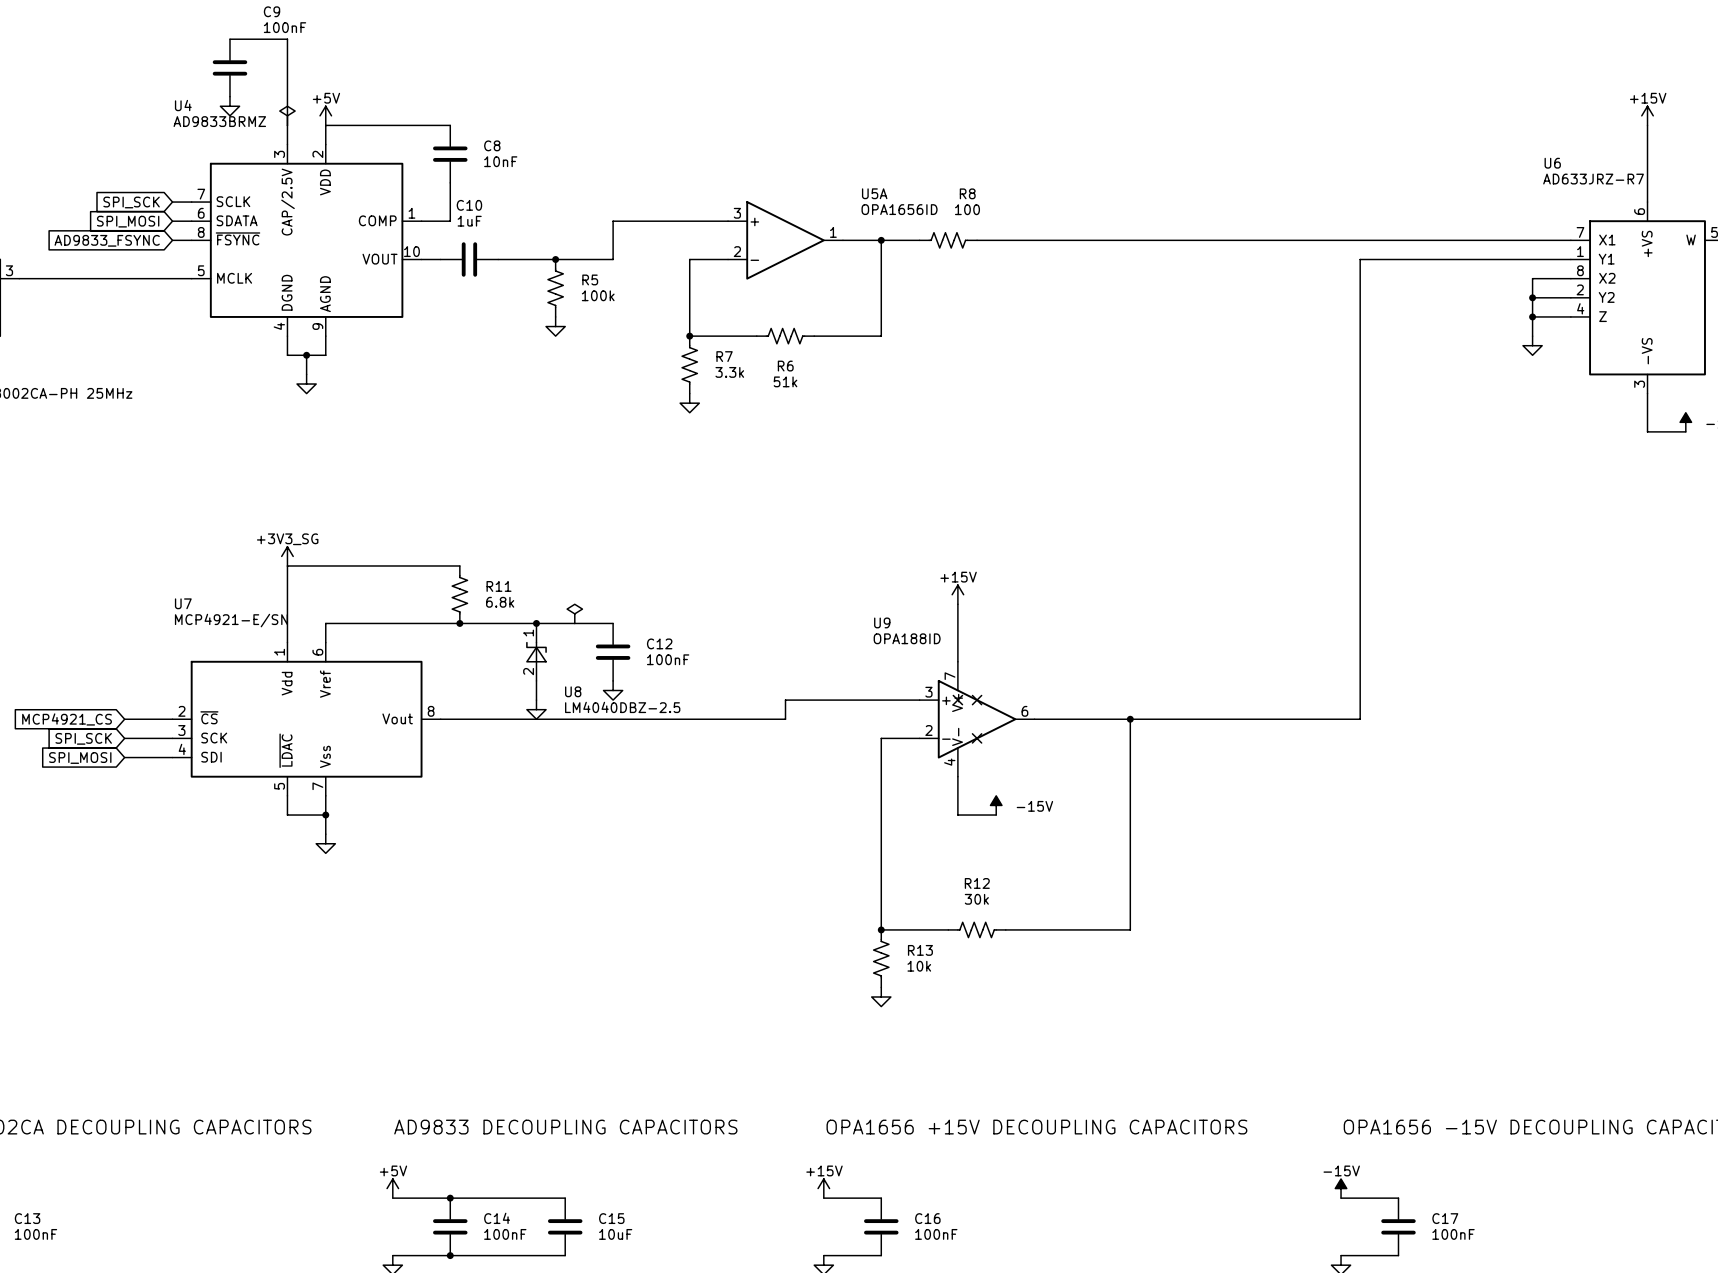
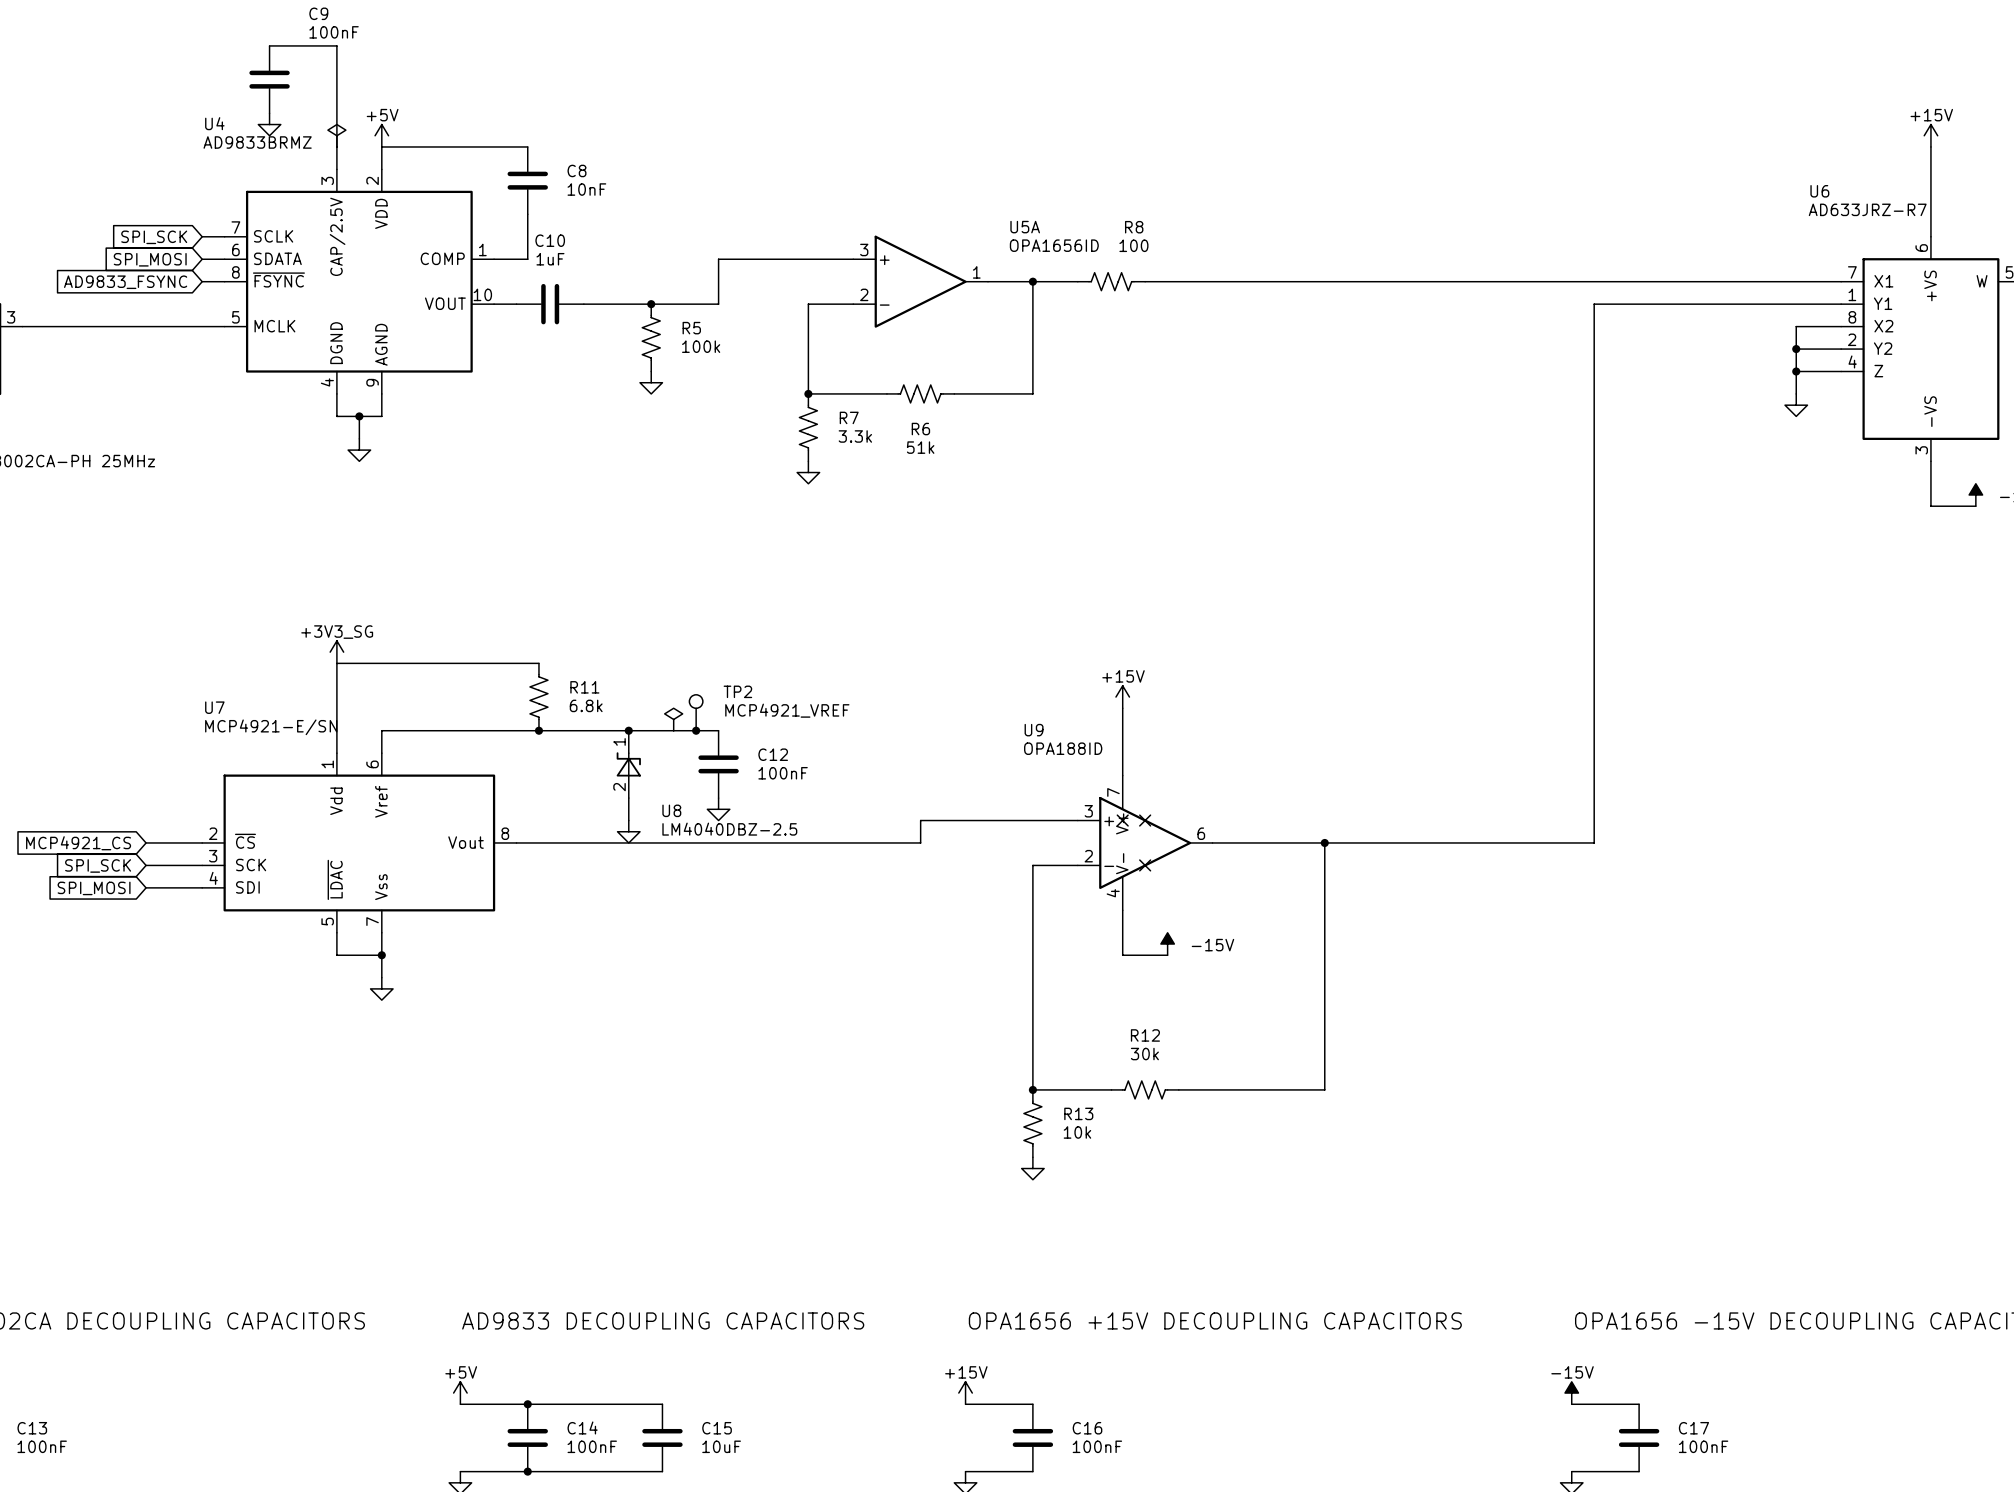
TP2: none -> MCP4921_VREF (696, 712)
junction: none -> (696, 730)

